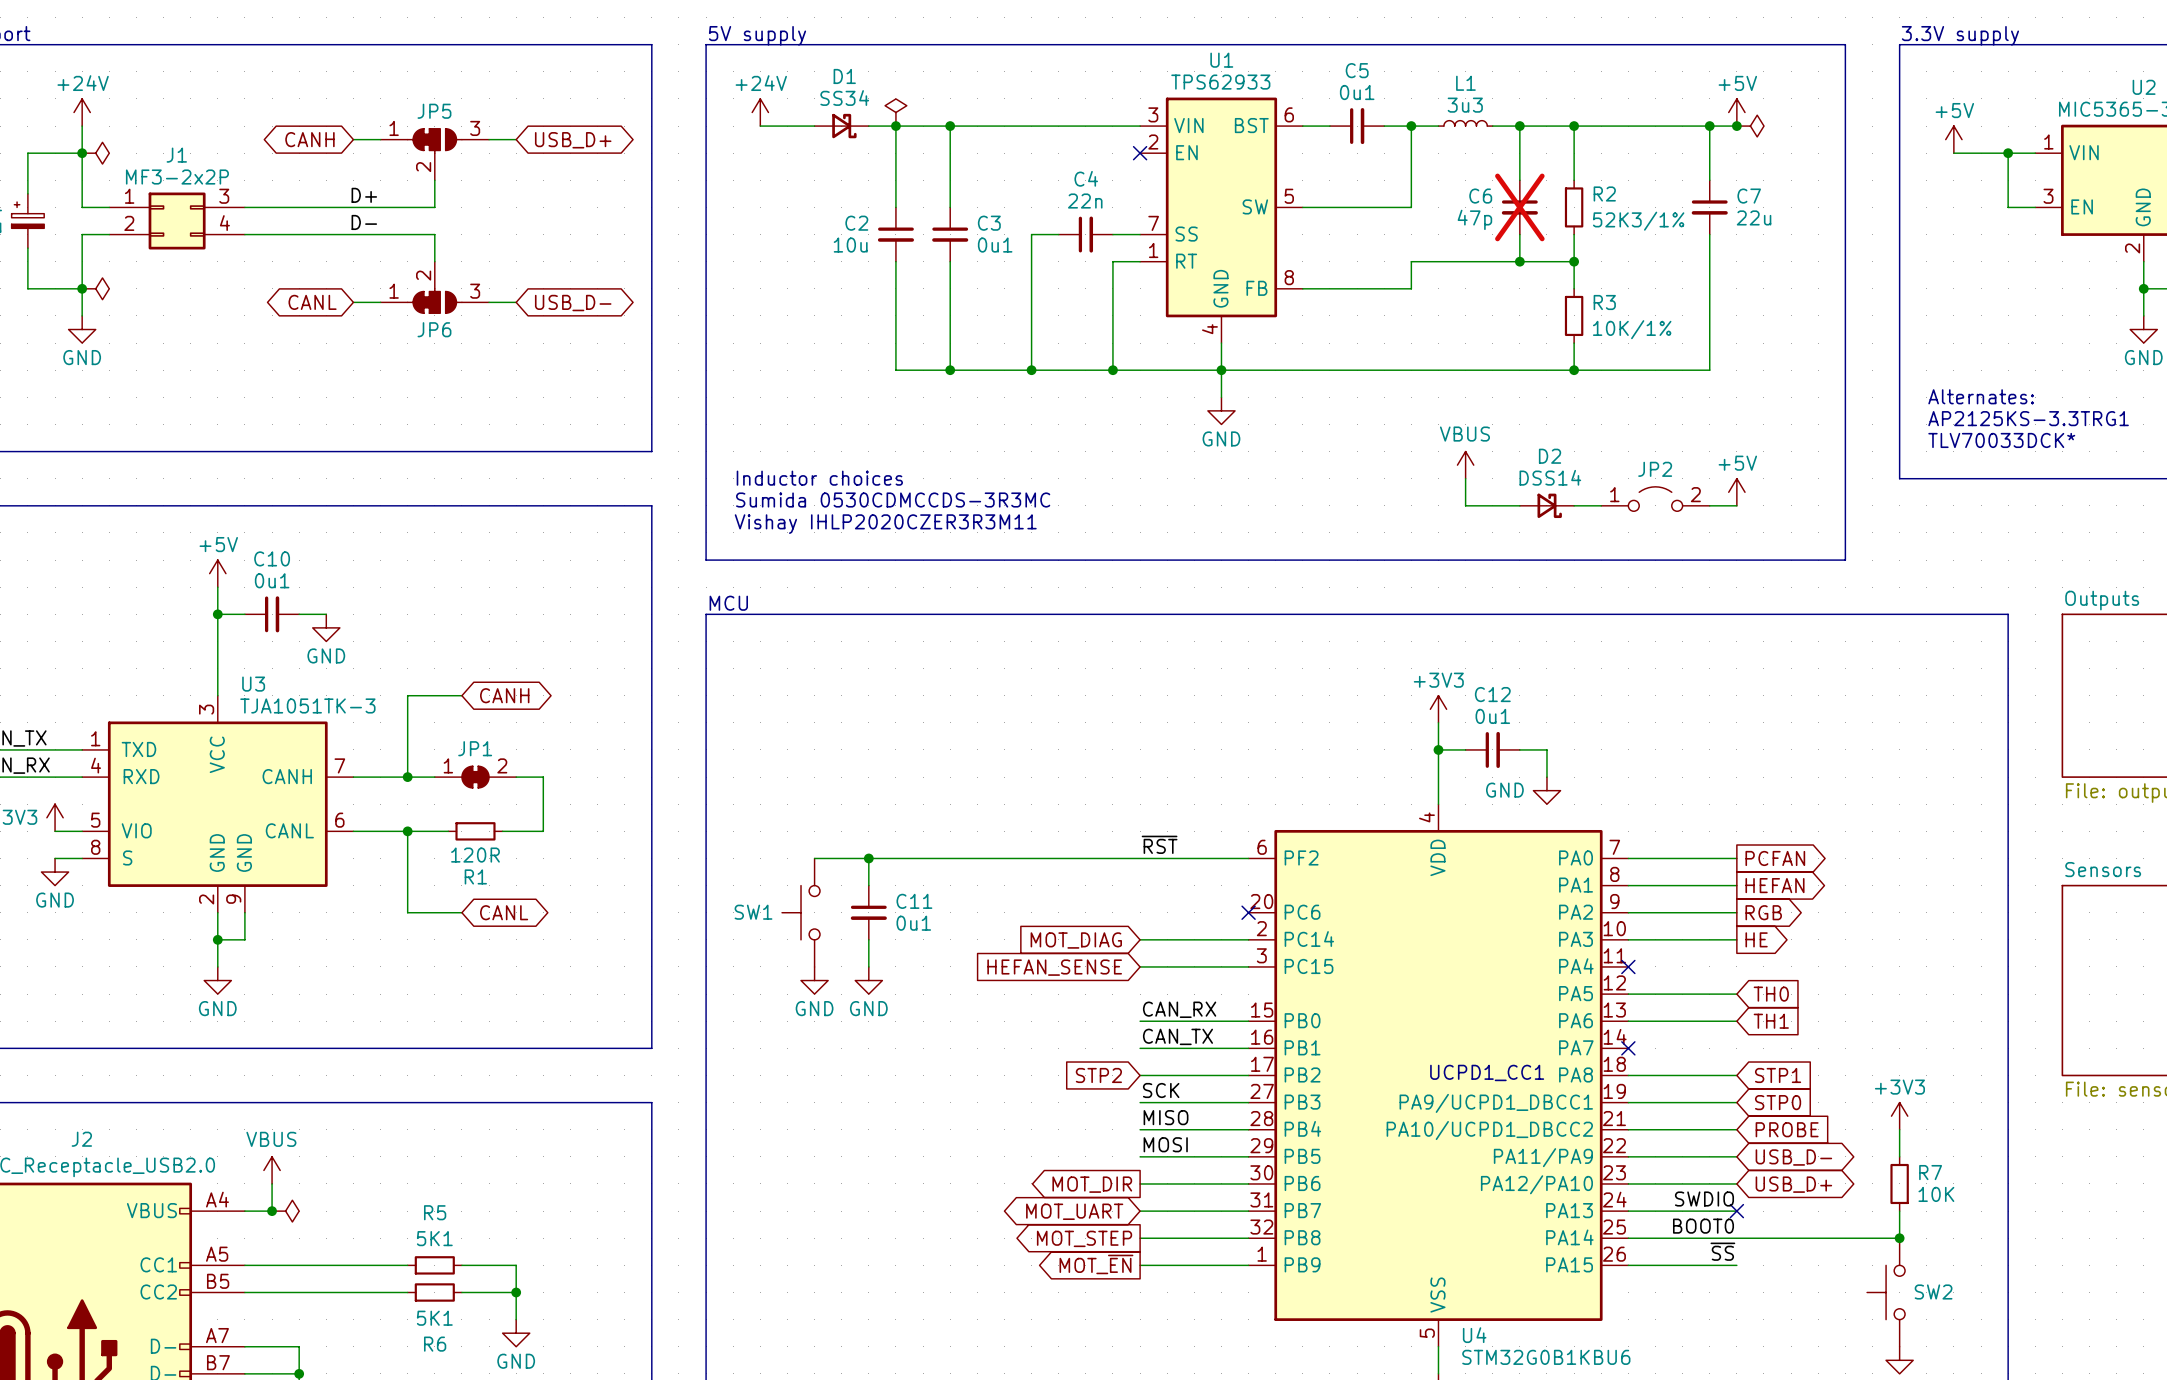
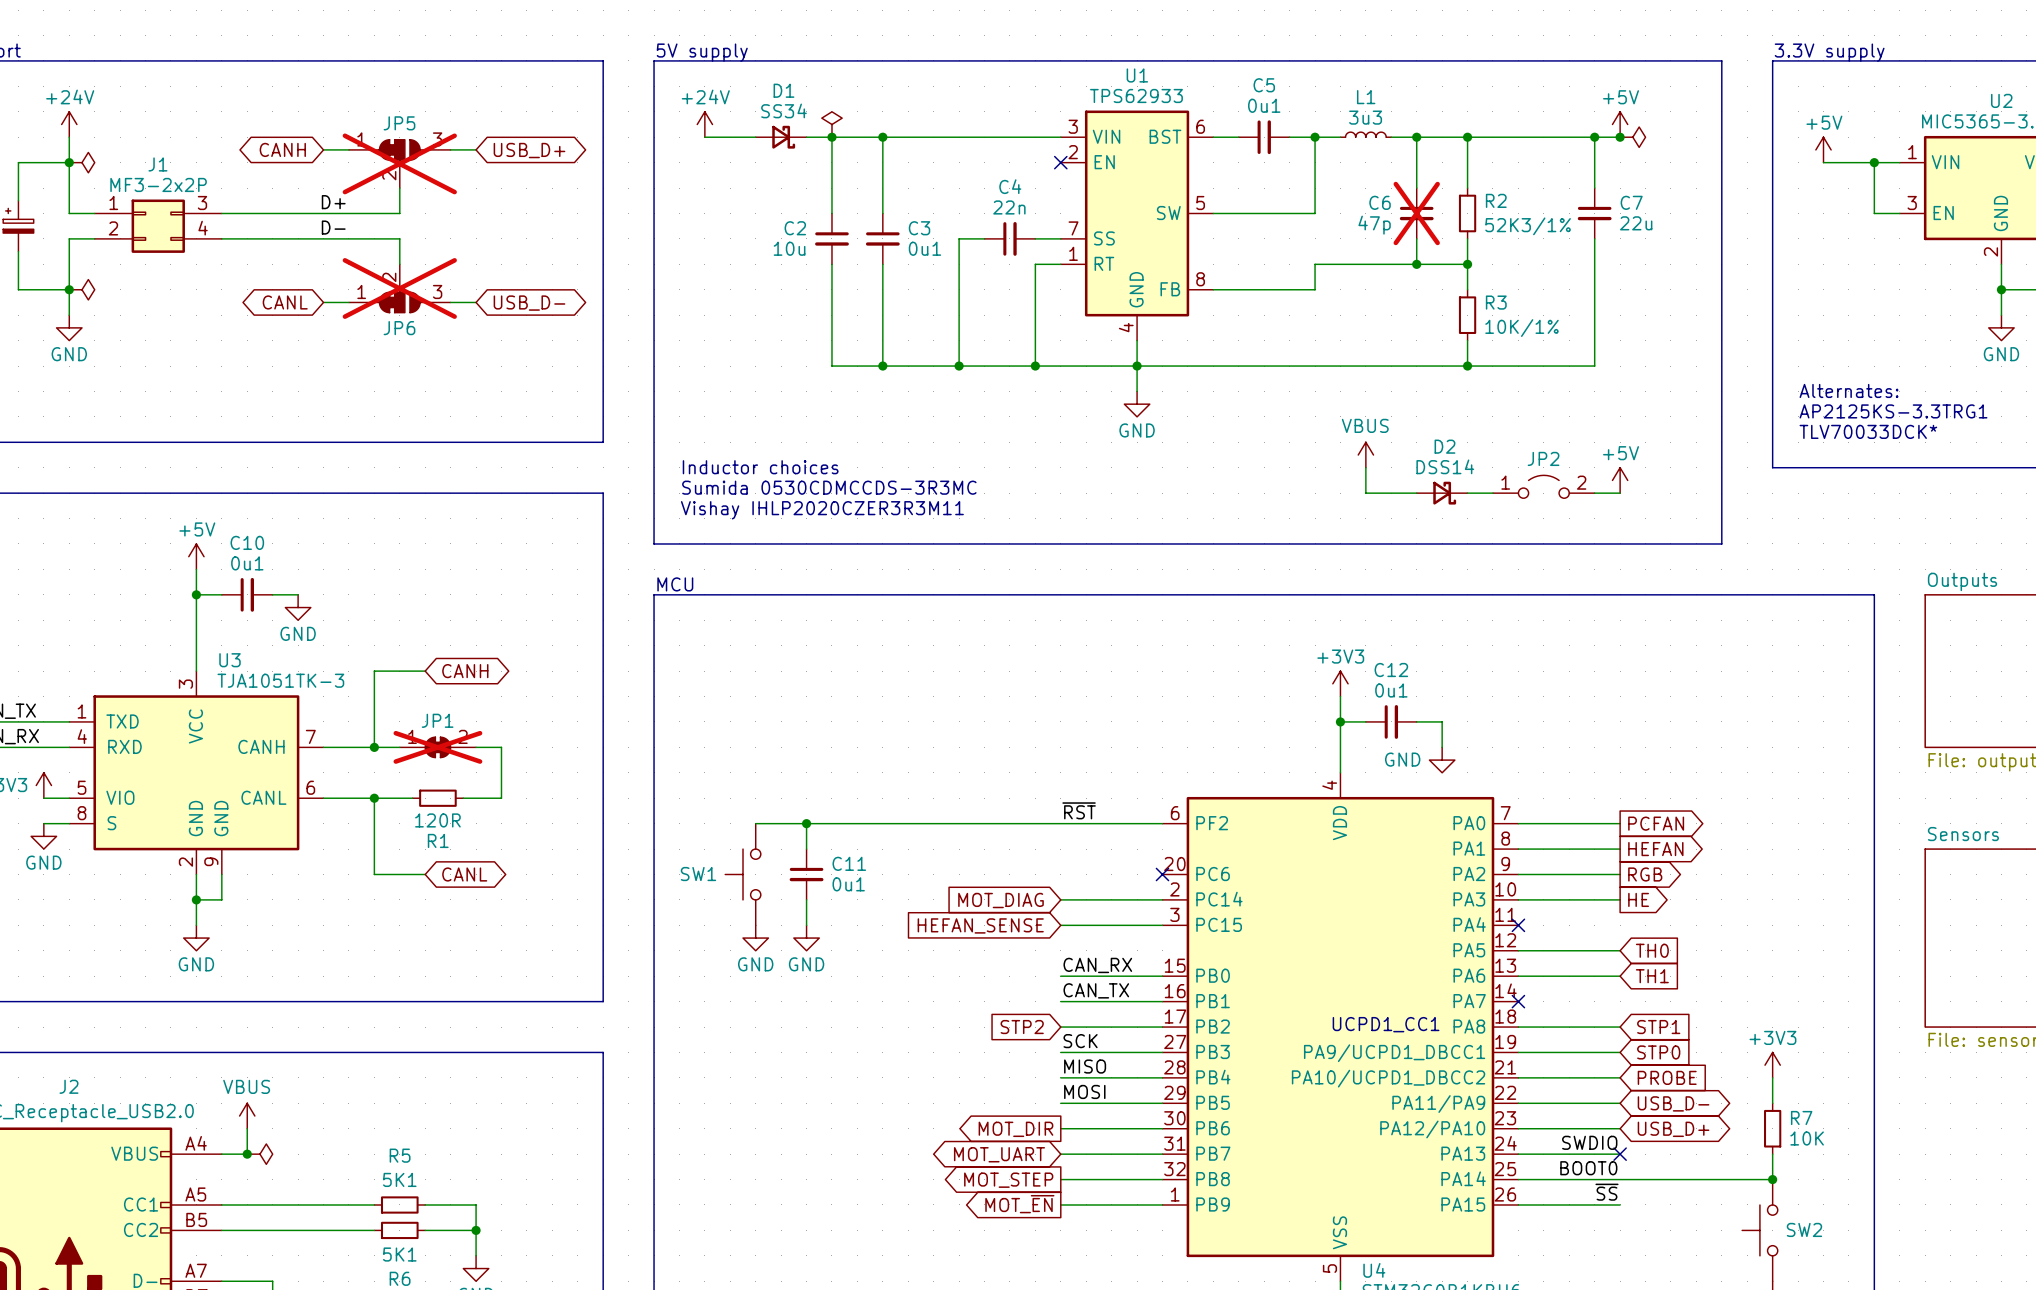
JP5 do-not-place cross: none -> (399, 163)
JP6 do-not-place cross: none -> (399, 288)
JP1 do-not-place cross: none -> (437, 747)

